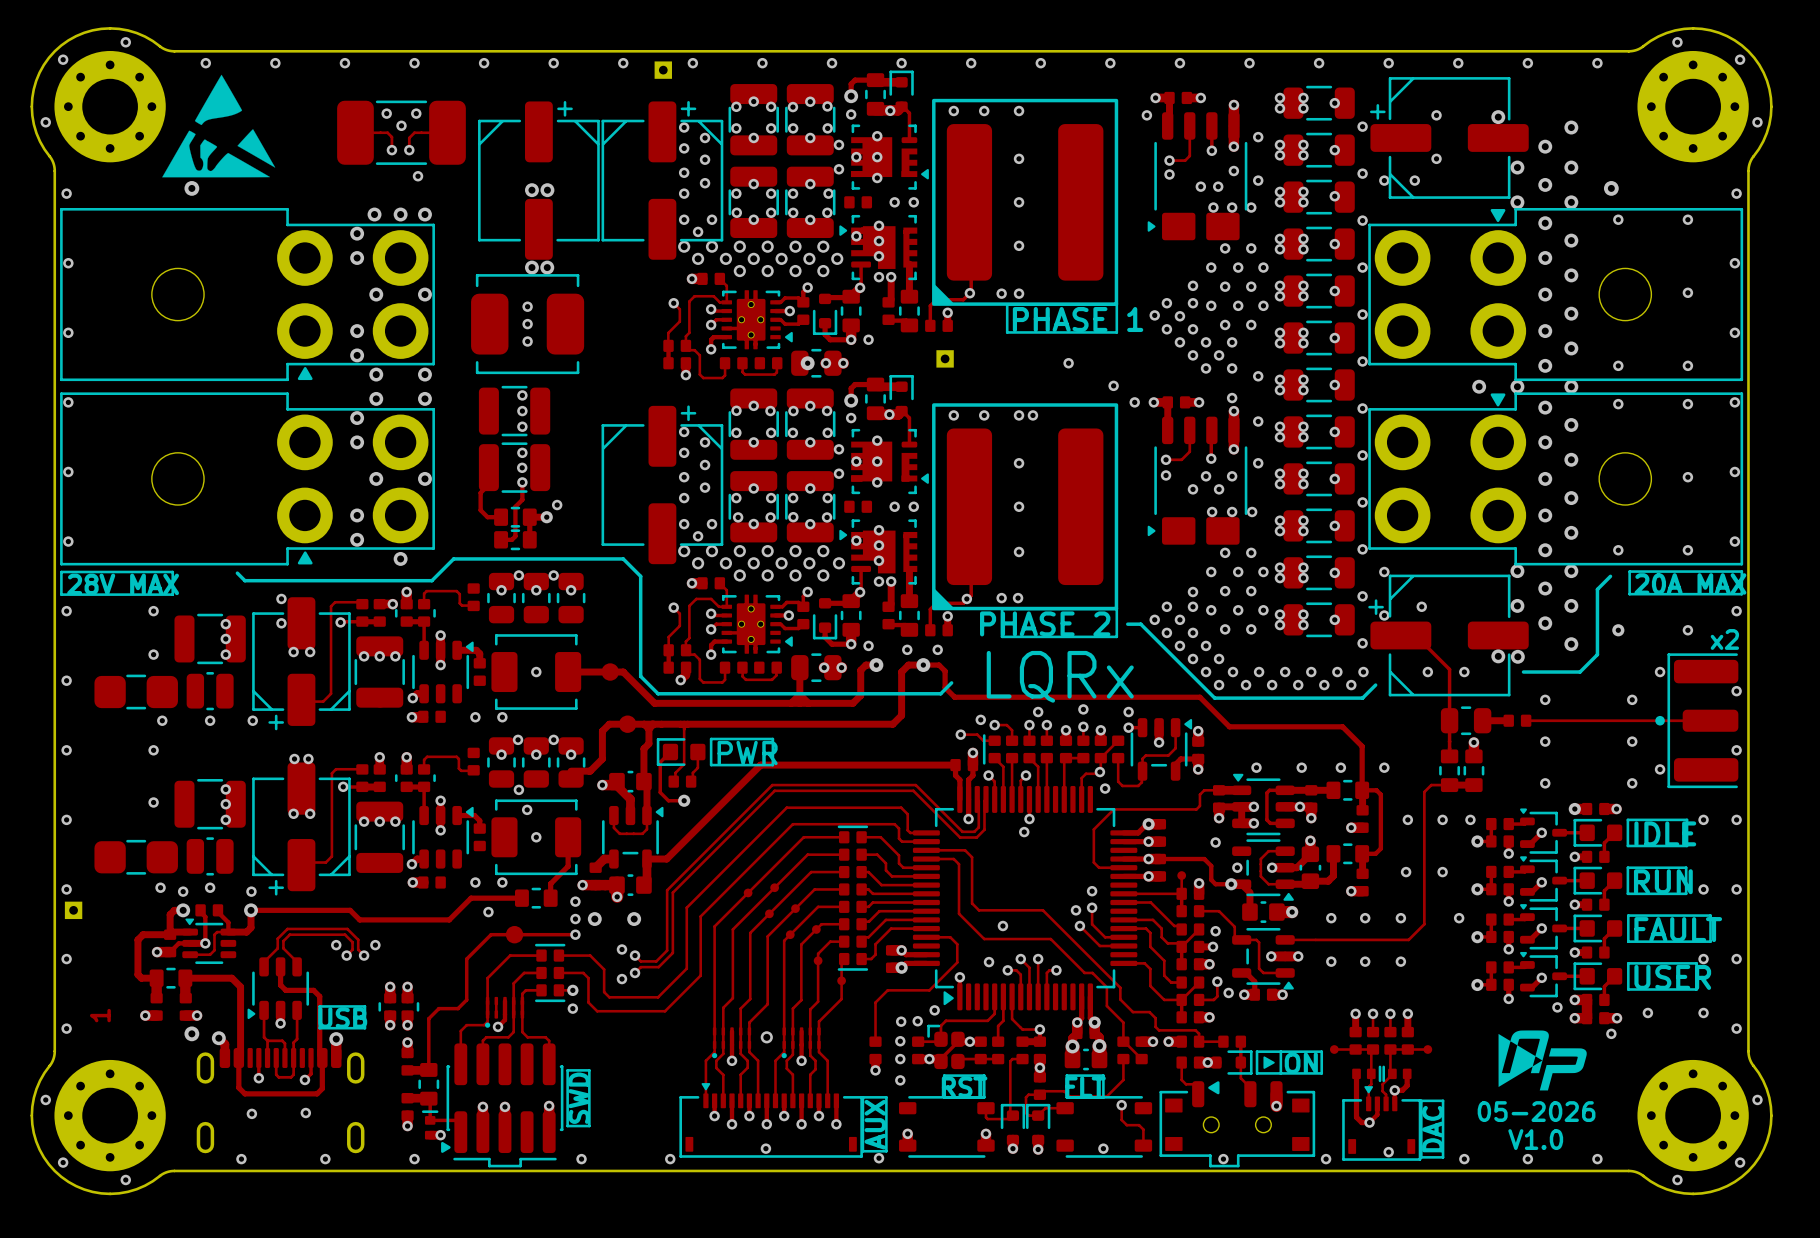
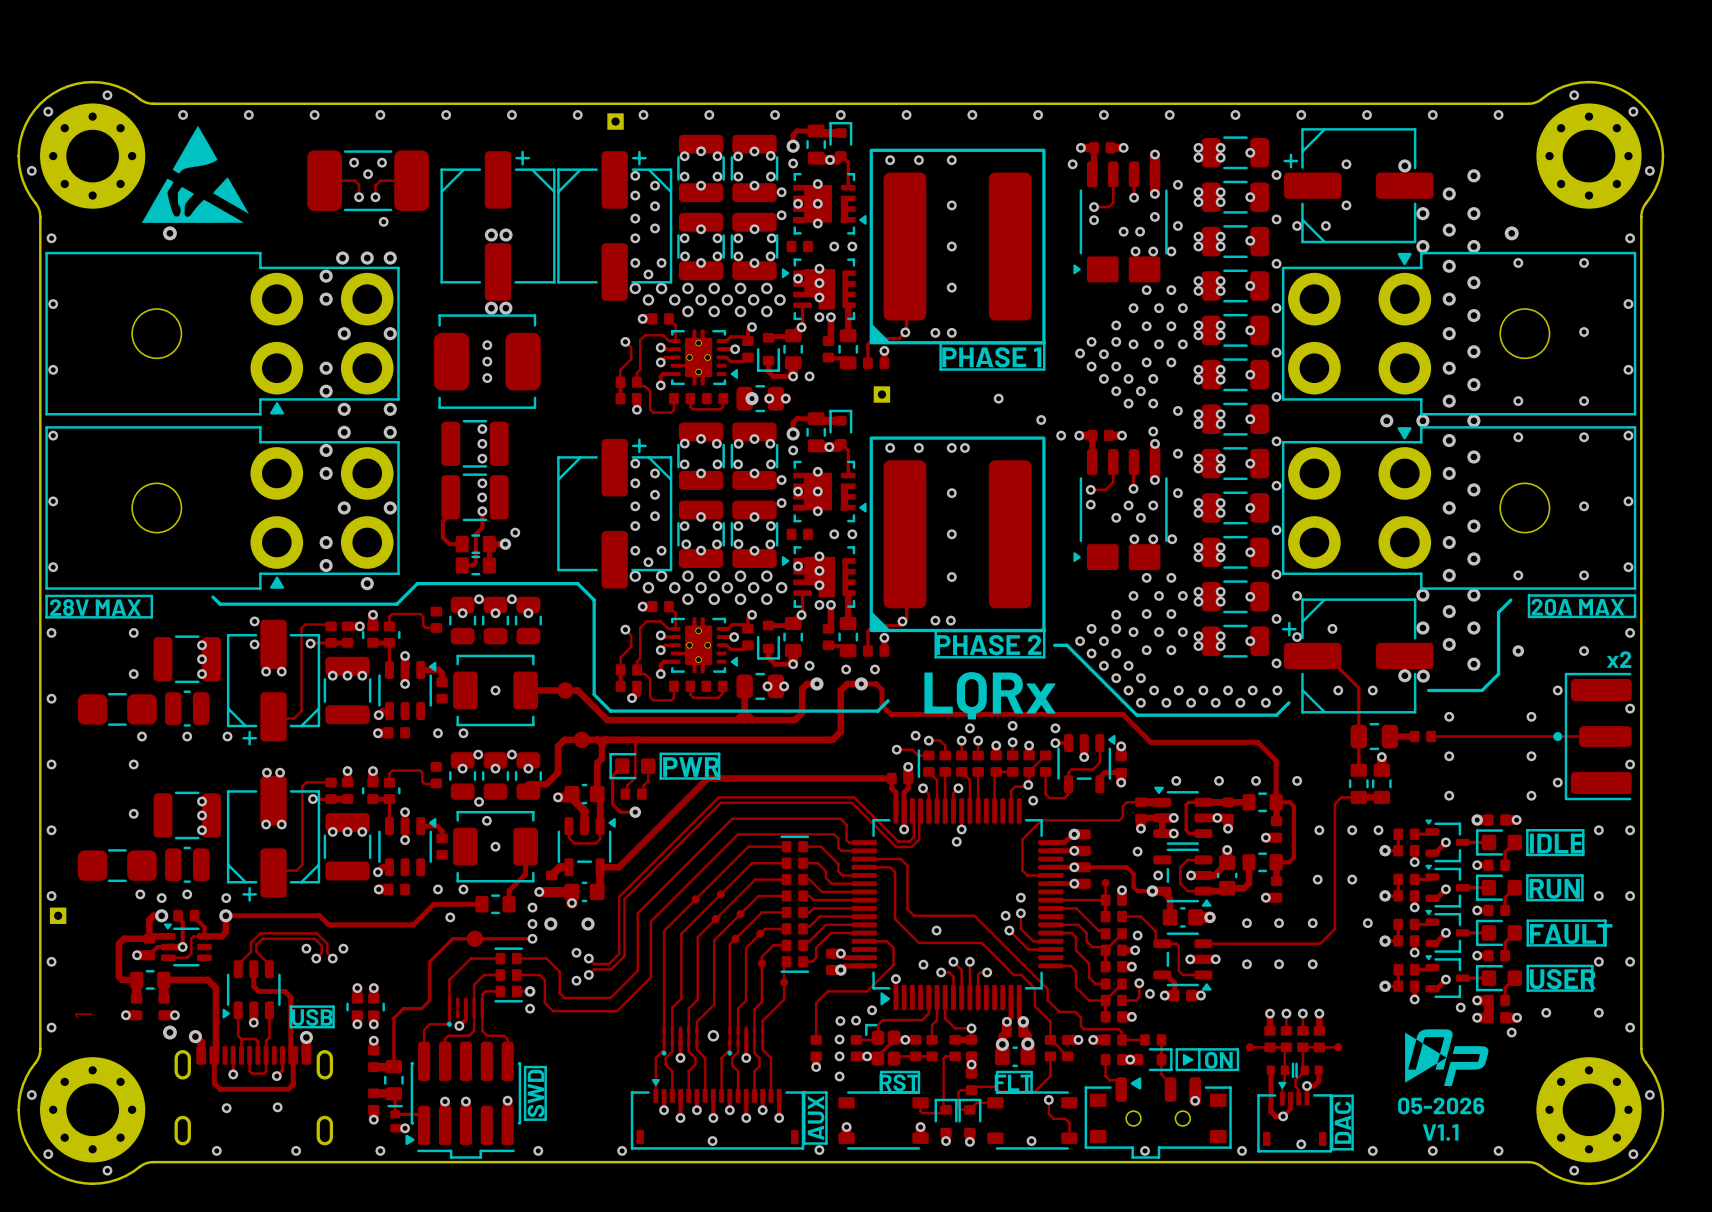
text: V1.0 (1535, 1139) -> V1.1 (1440, 1132)

